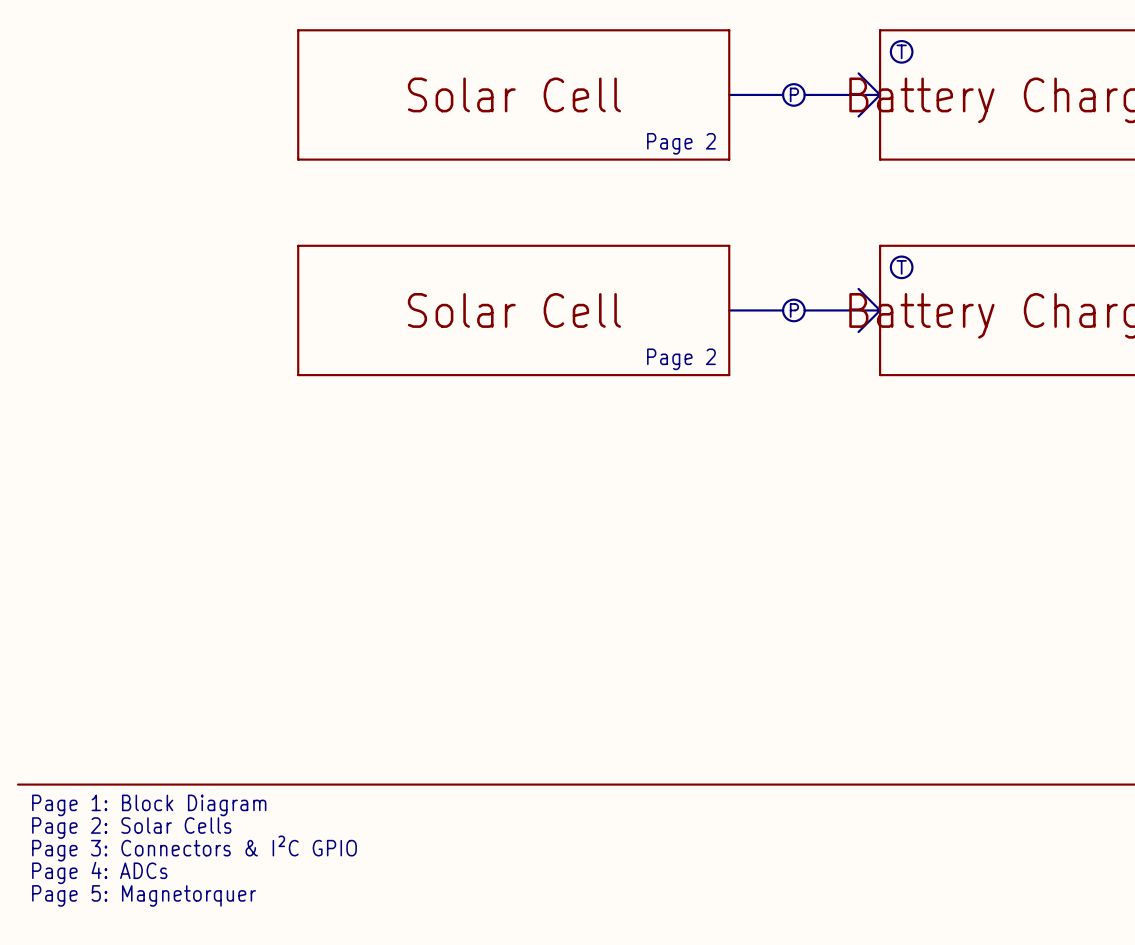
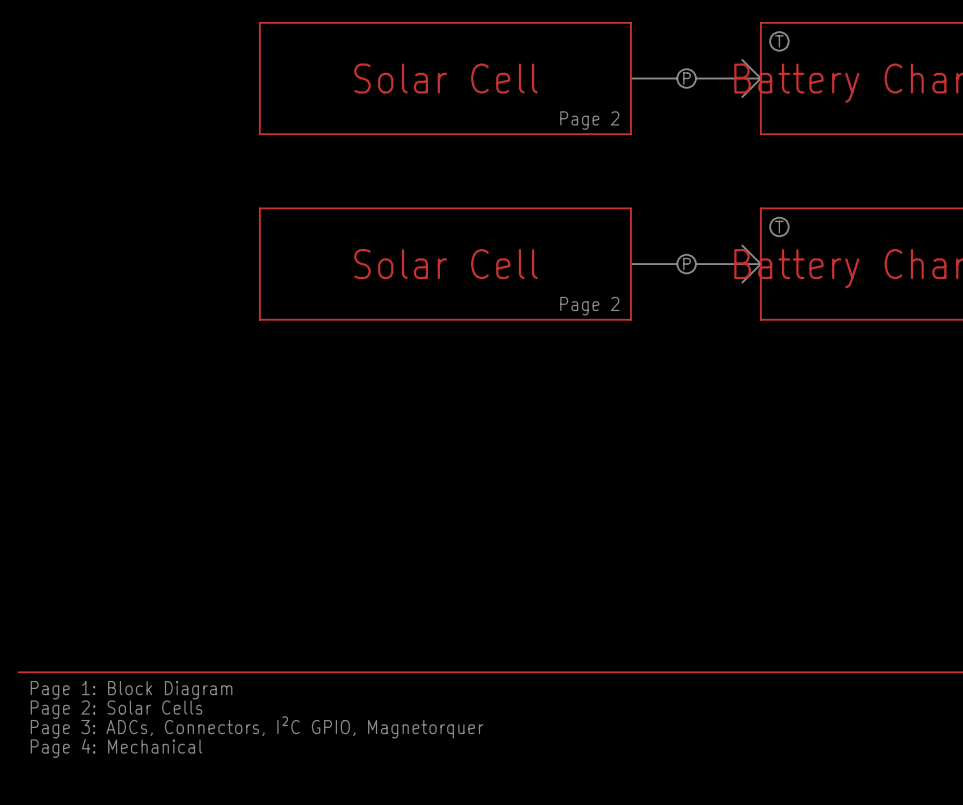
text: Page 3: Connectors & I²C GPIO (194, 848) -> Page 3: ADCs, Connectors, I²C GPIO, Magnetorquer (257, 727)
text: Page 4: ADCs (99, 872) -> Page 4: Mechanical (116, 748)
text: Page 5: Magnetorquer (144, 895) -> none

